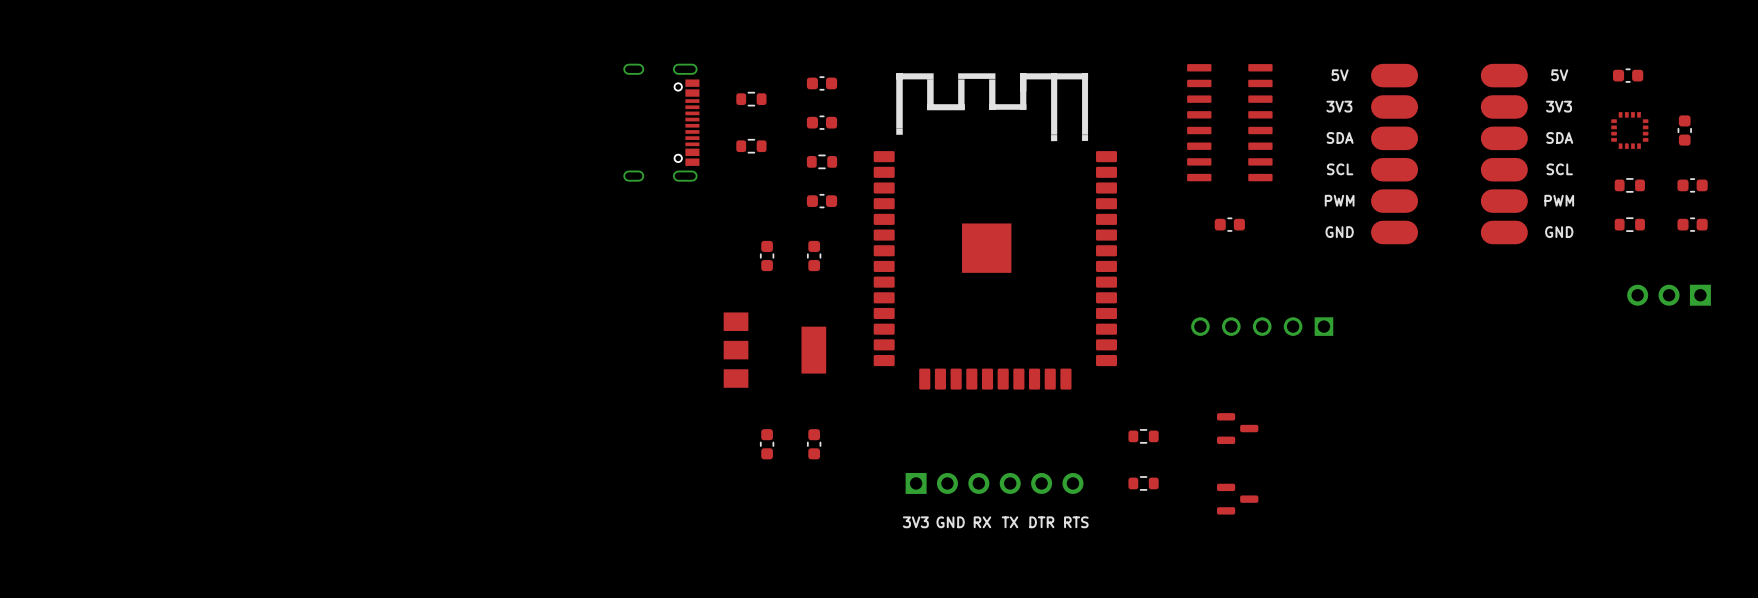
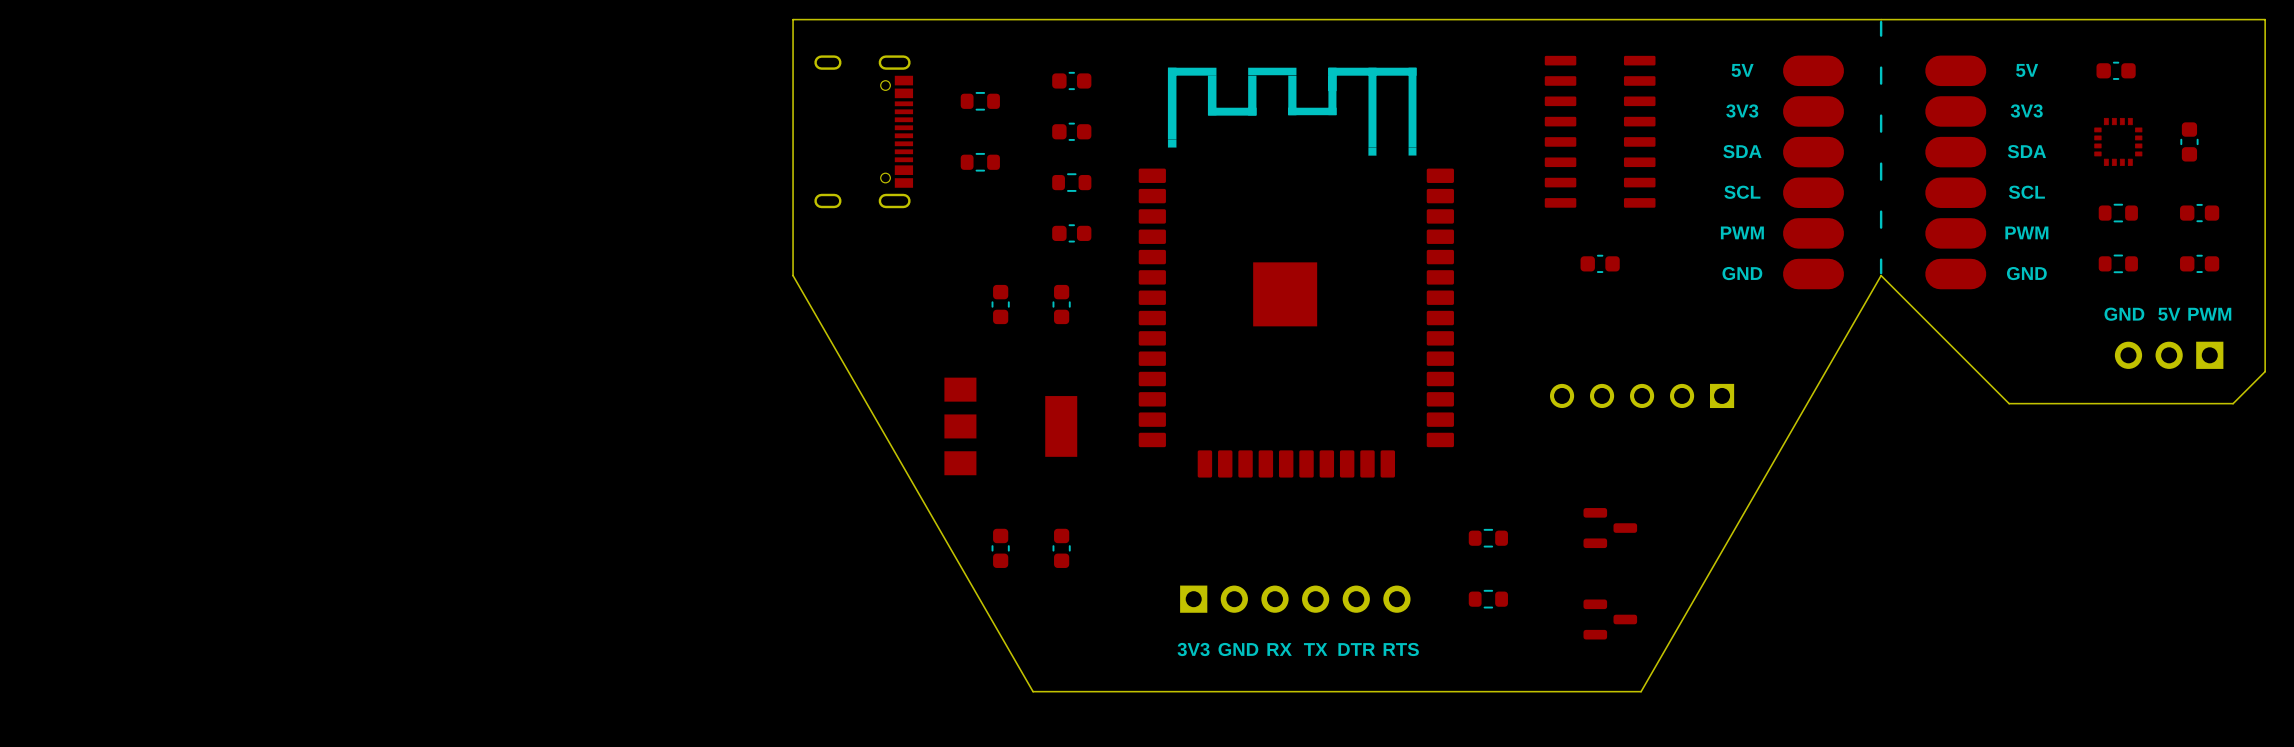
board edge: none -> (793, 19) (793, 275) (1033, 691) (1641, 691) (1881, 275) (2009, 403) (2233, 403) (2265, 371) (2265, 19) (793, 19)
line: none -> (1881, 22) (1881, 35)
line: none -> (1881, 67) (1881, 83)
line: none -> (1881, 115) (1881, 131)
line: none -> (1881, 163) (1881, 179)
line: none -> (1881, 211) (1881, 227)
line: none -> (1881, 259) (1881, 273)
text: none -> GND (2124, 314)
text: none -> 5V (2169, 314)
text: none -> PWM (2209, 314)

